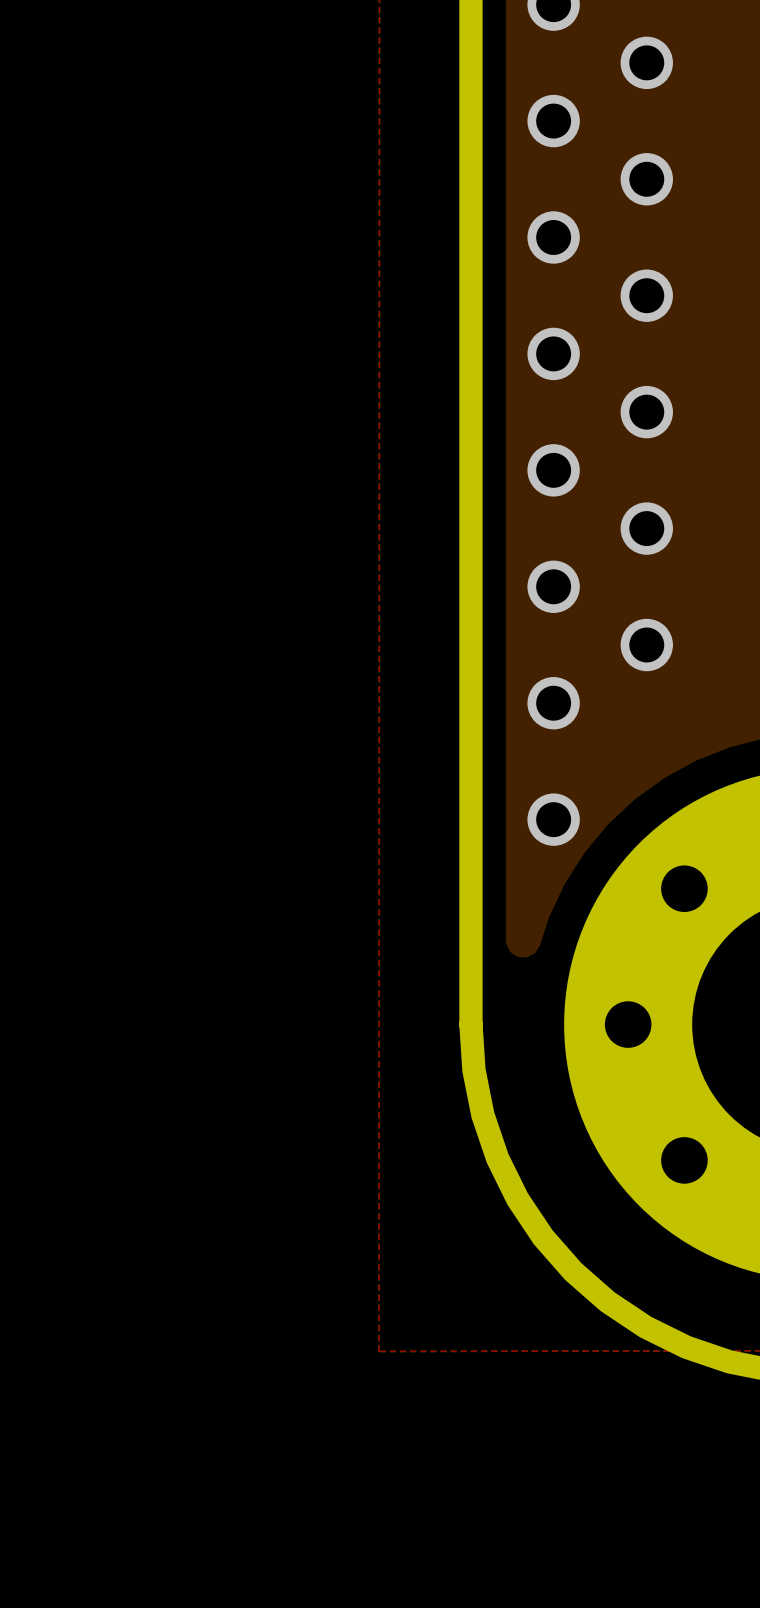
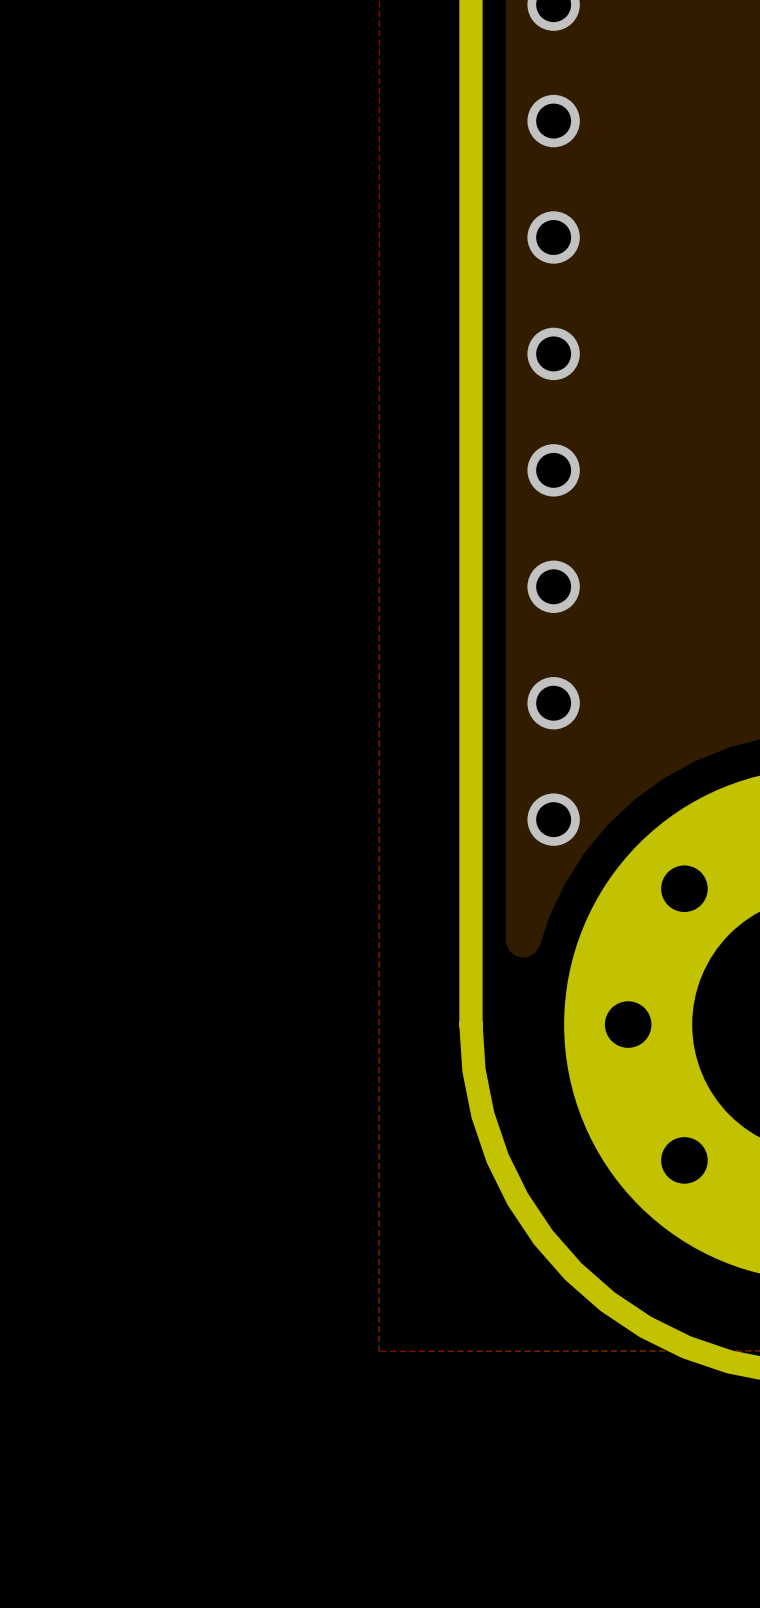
via: (646, 62) -> none
via: (646, 179) -> none
via: (646, 295) -> none
via: (646, 412) -> none
via: (646, 528) -> none
via: (646, 645) -> none

